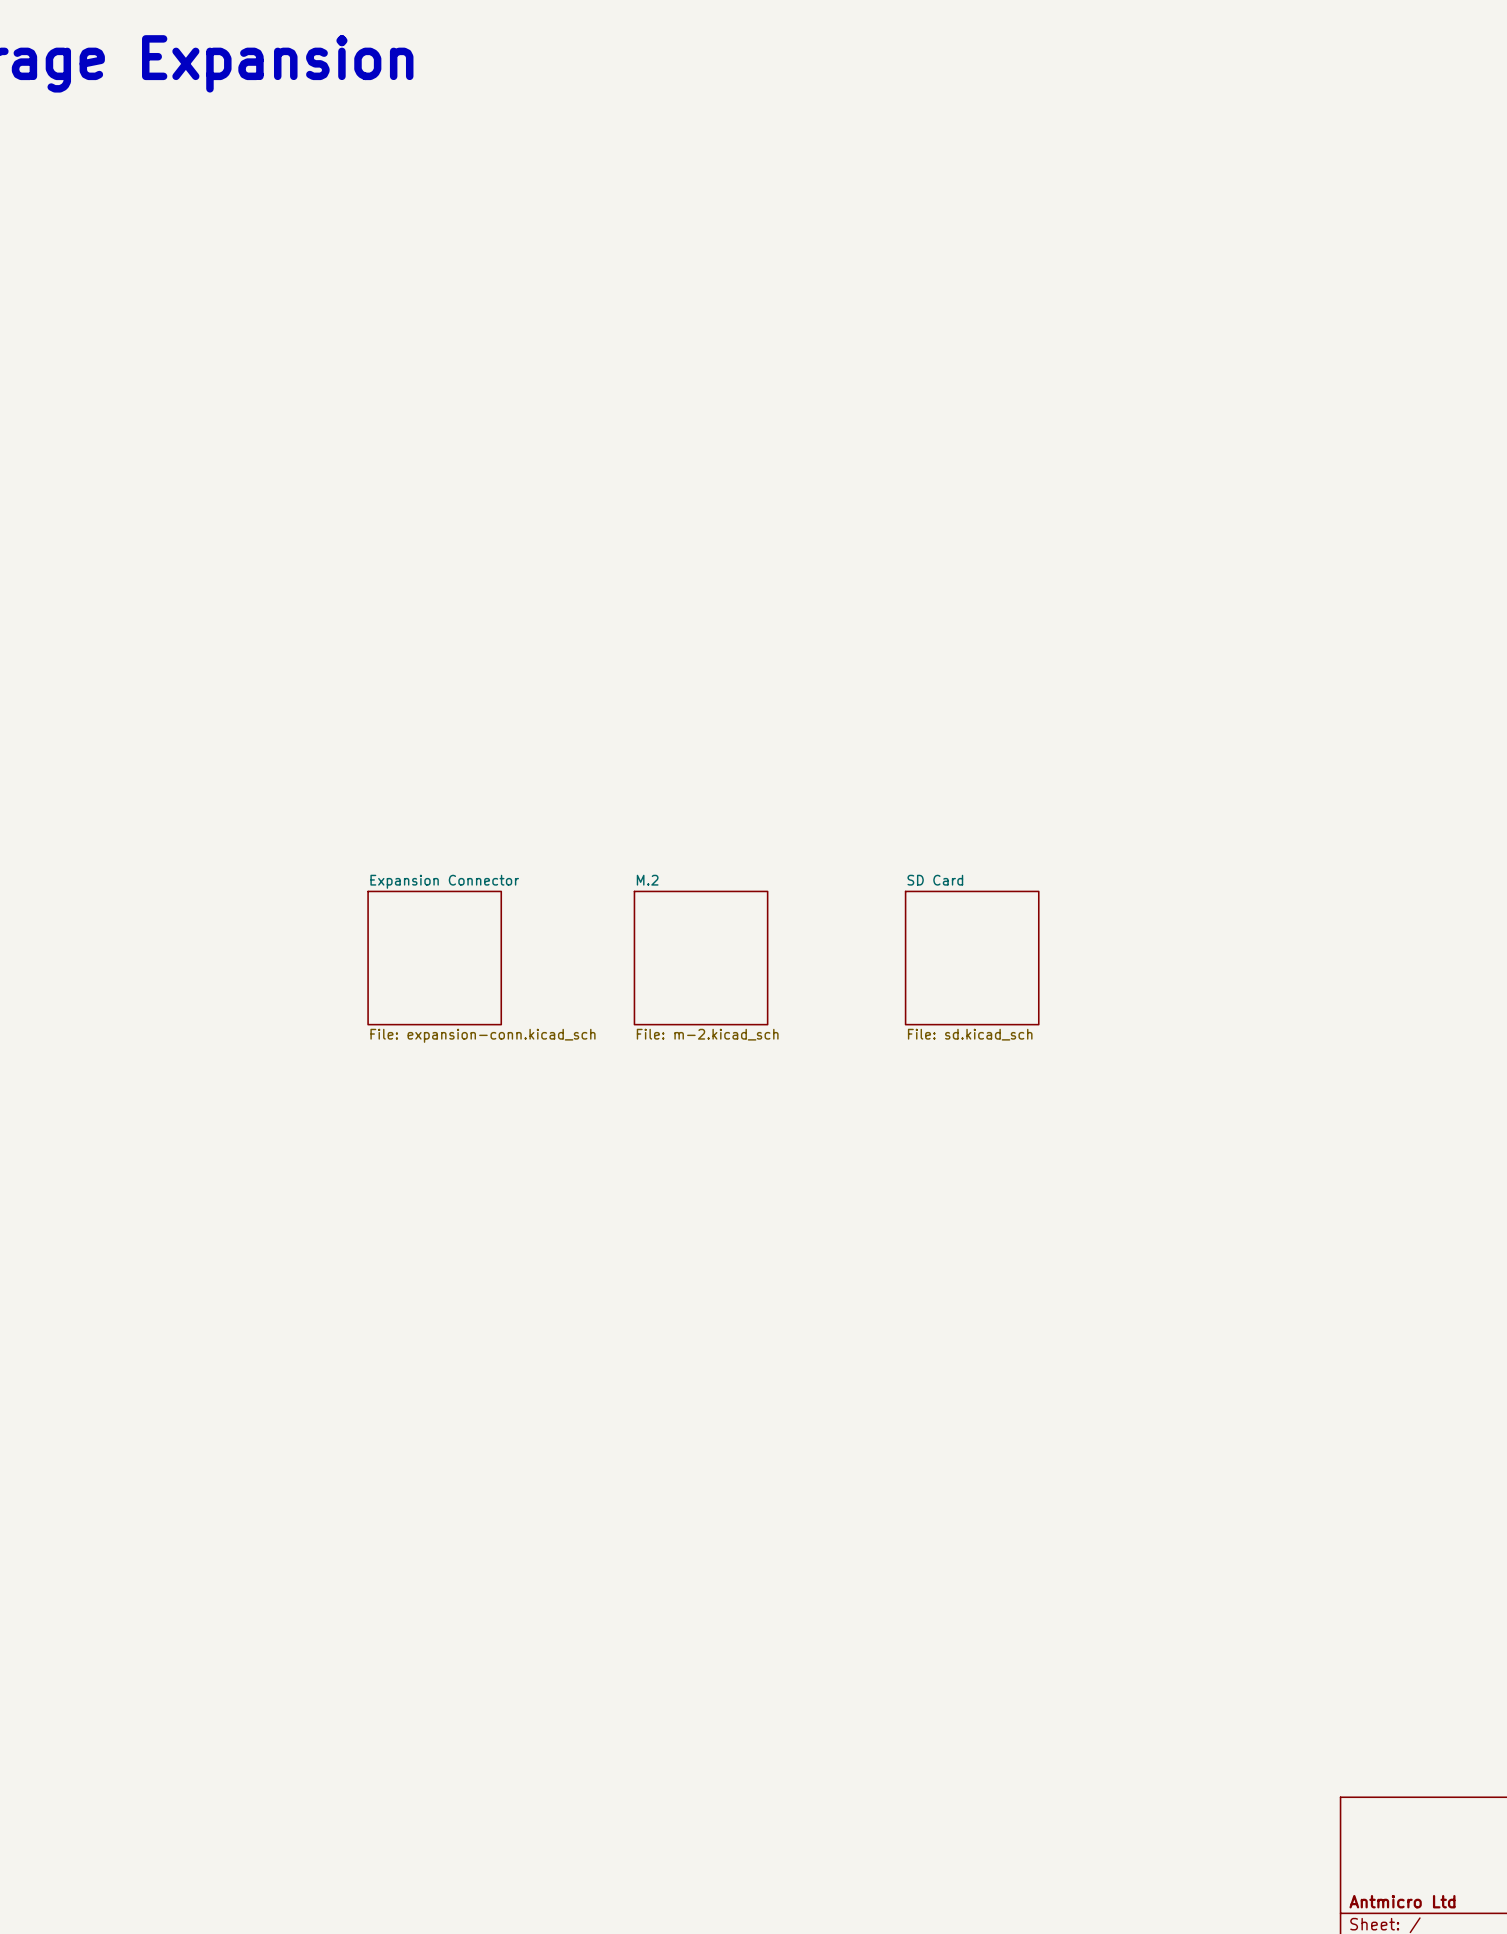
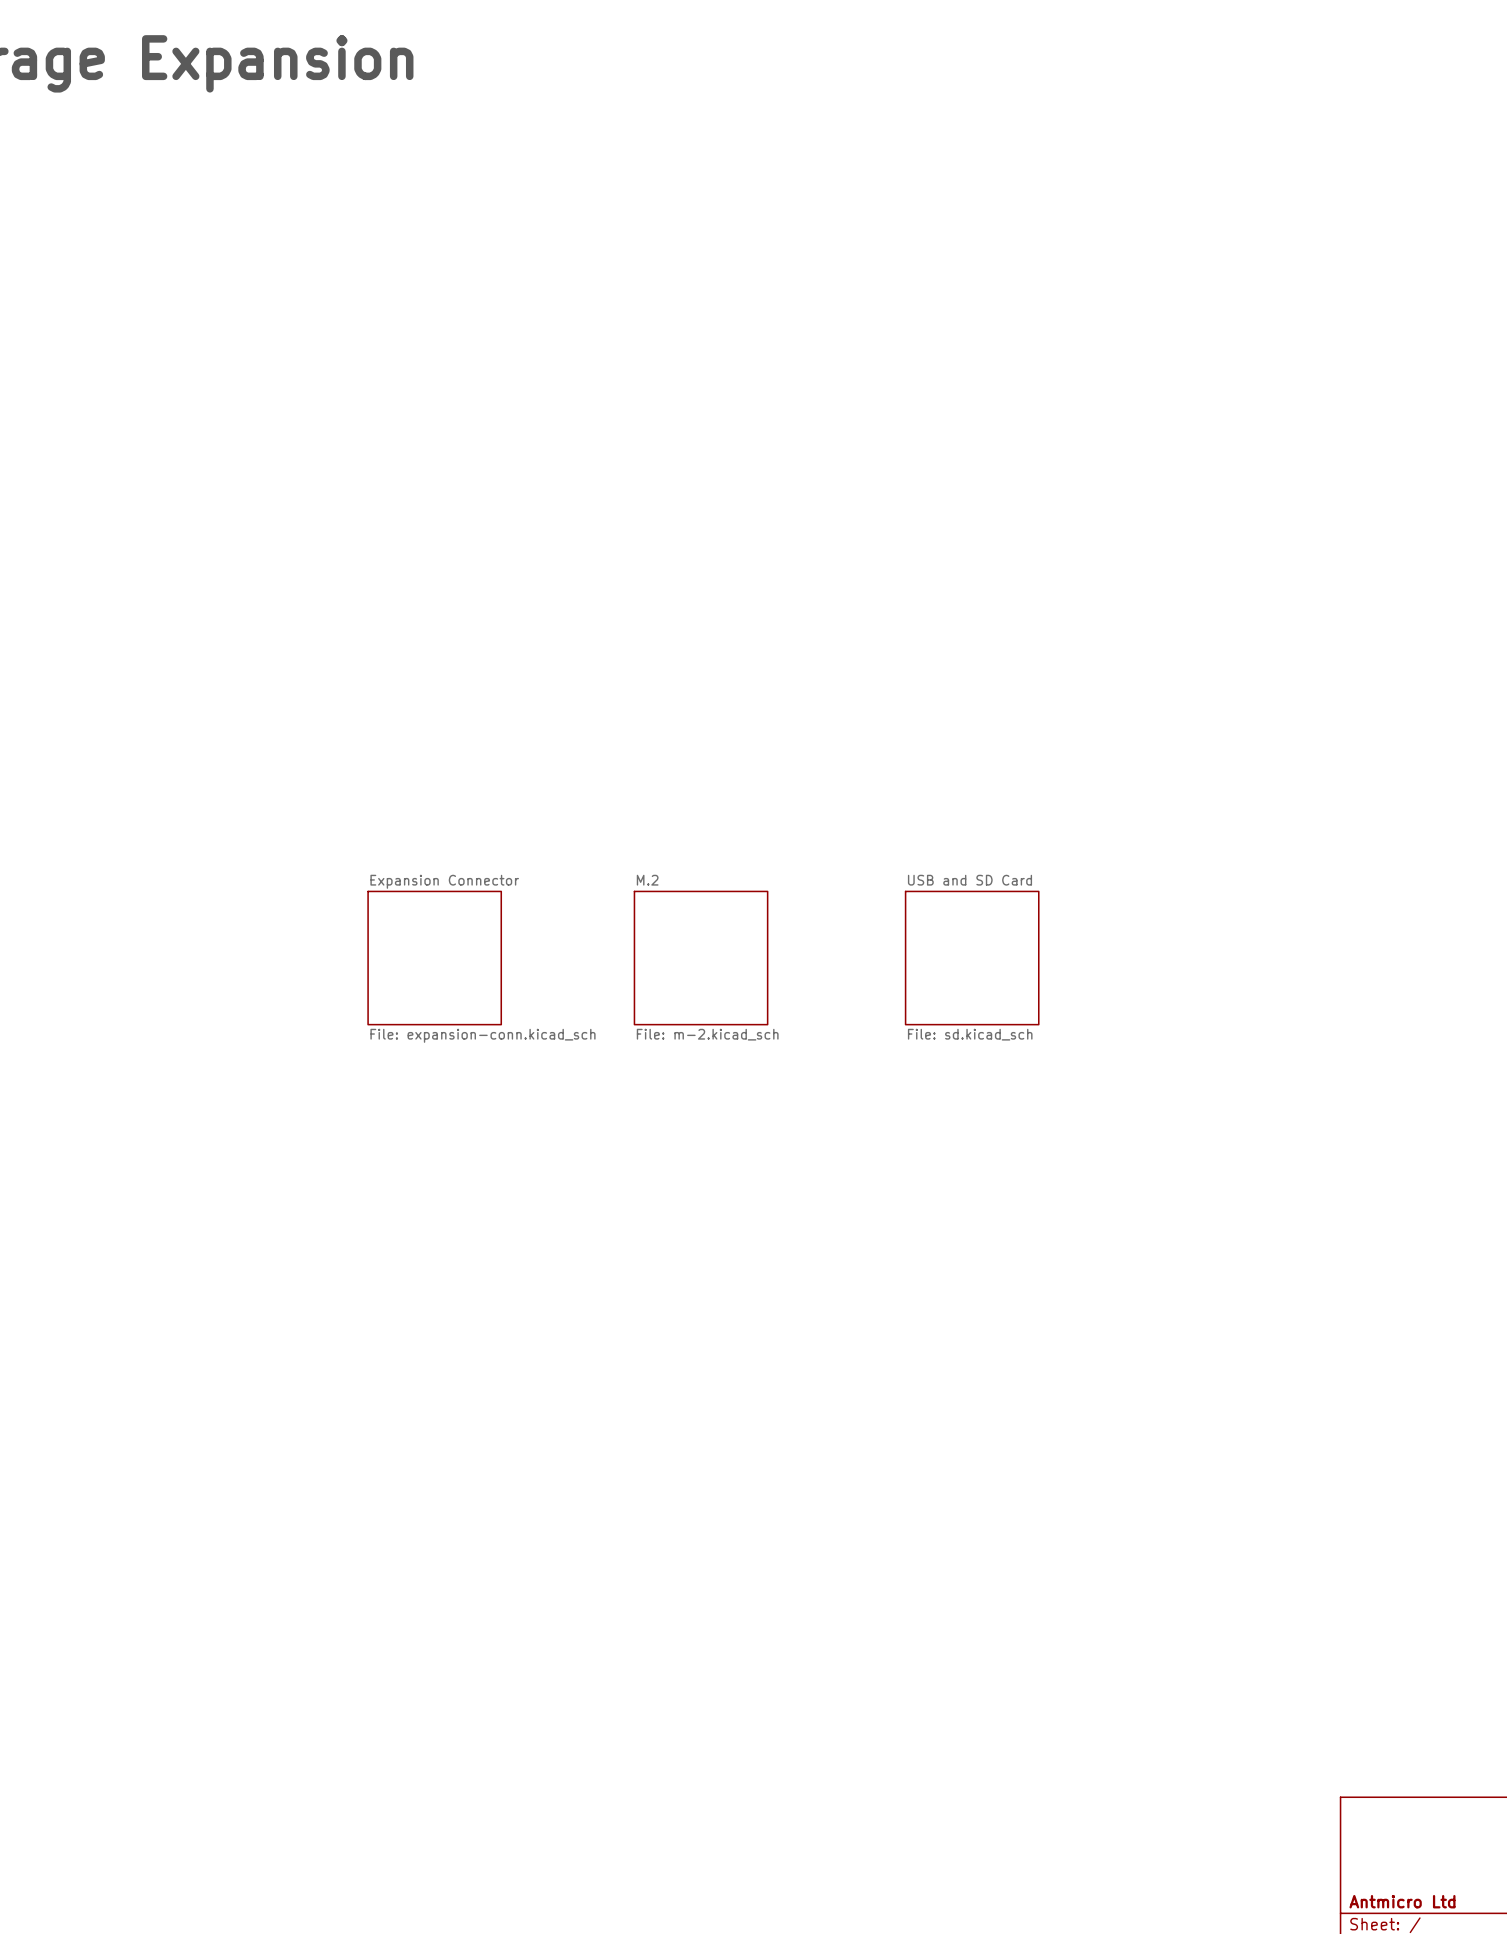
sheet SD Card name: SD Card (935, 880) -> USB and SD Card (969, 880)

